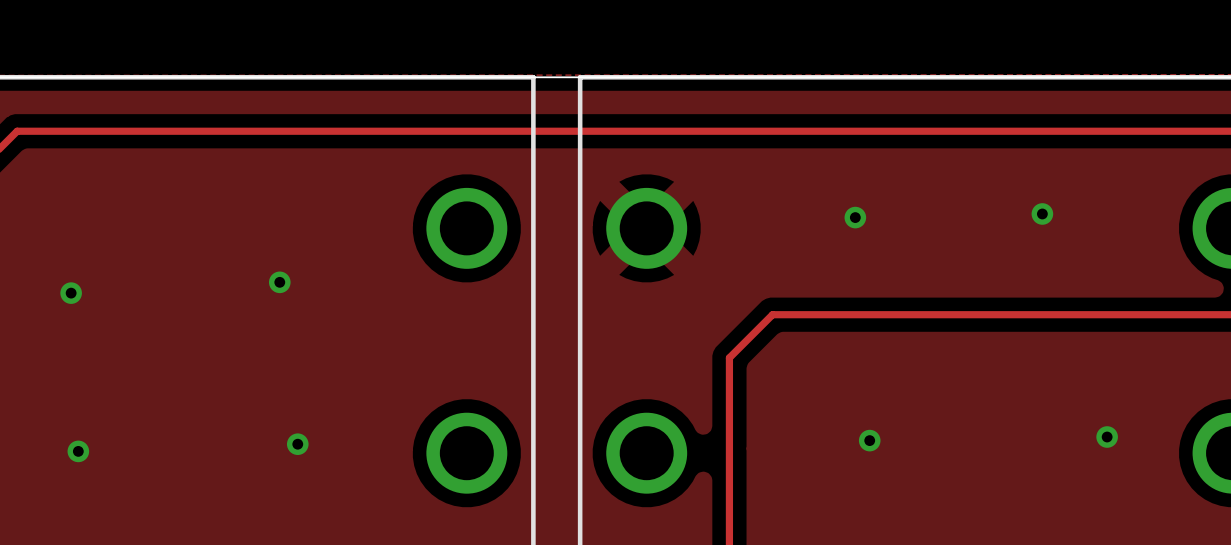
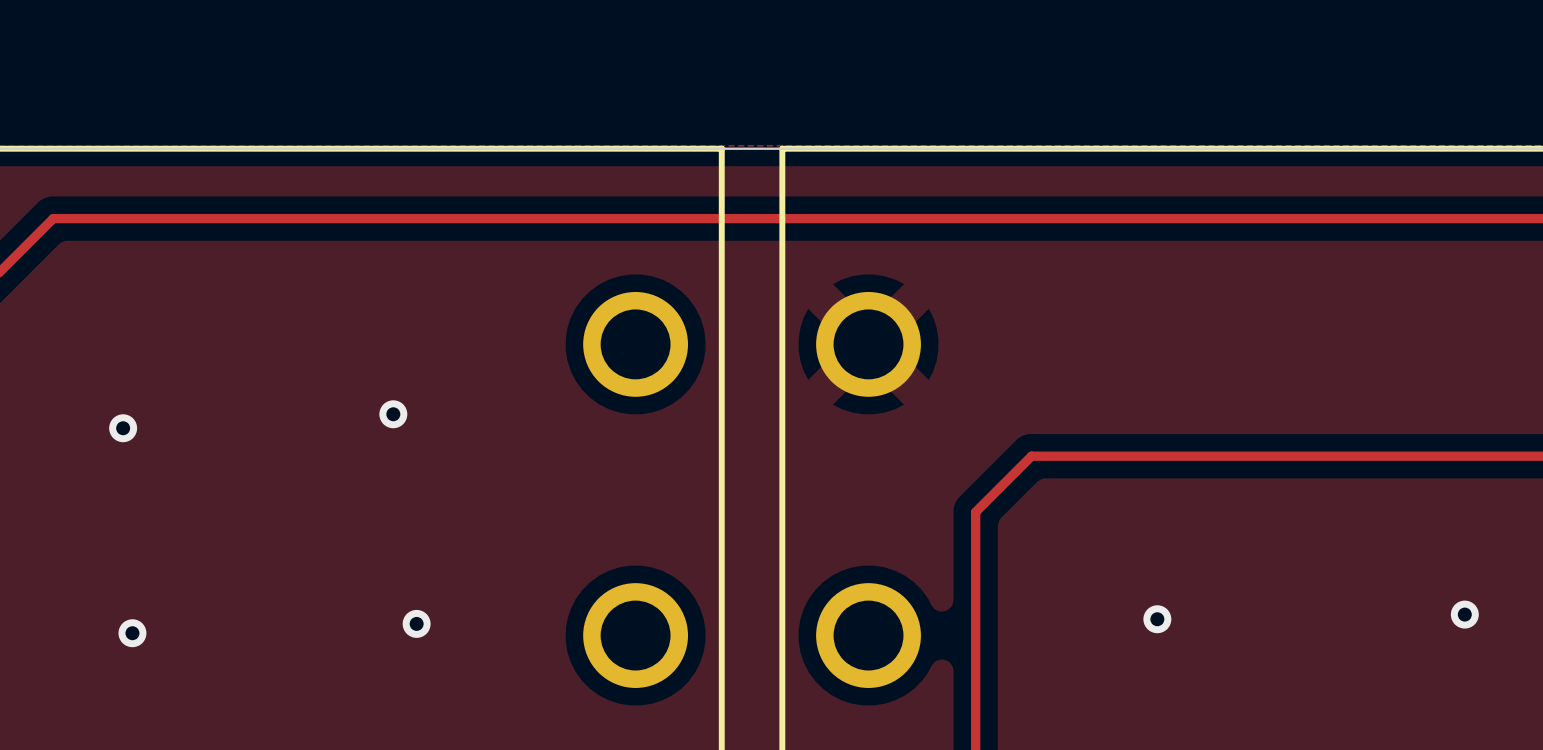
via: (1042, 213) -> none
via: (855, 217) -> none

